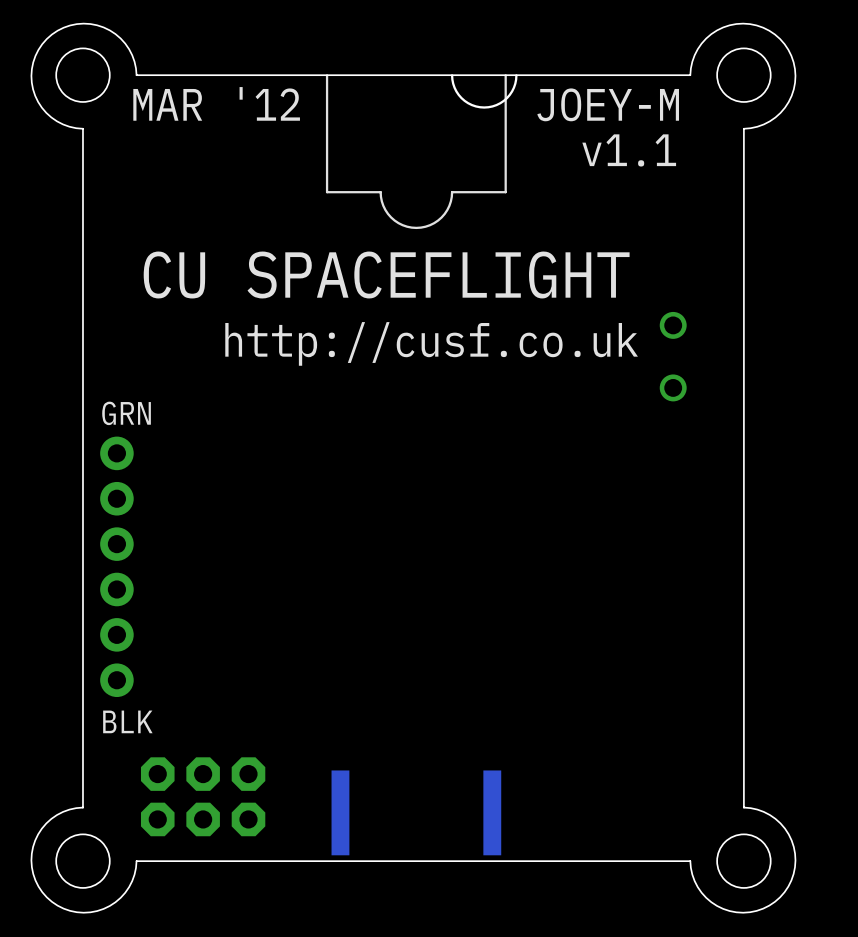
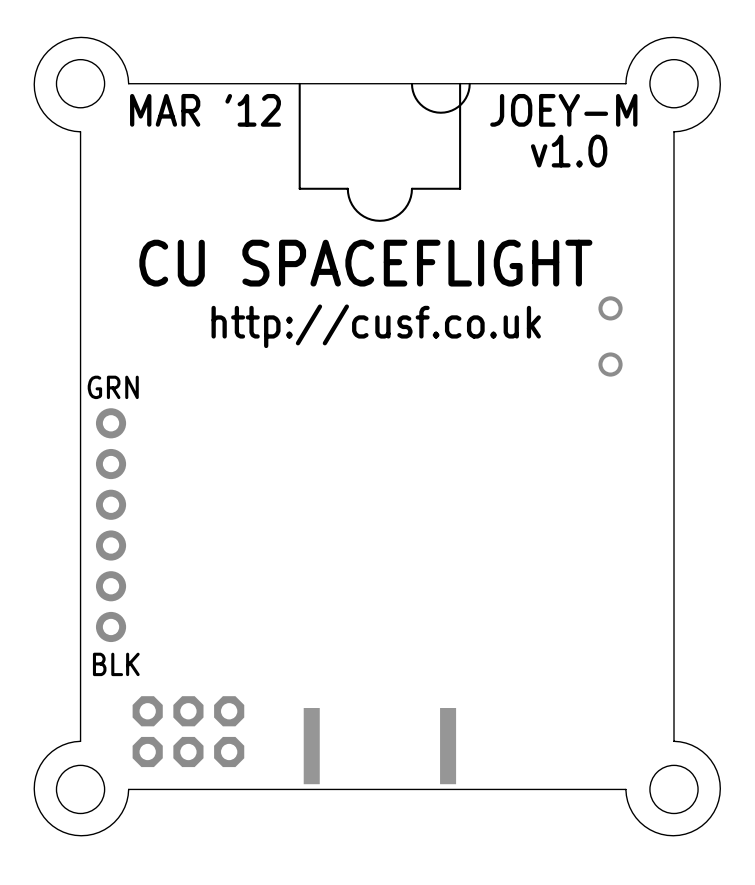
text: v1.1 (629, 150) -> v1.0 (569, 151)

